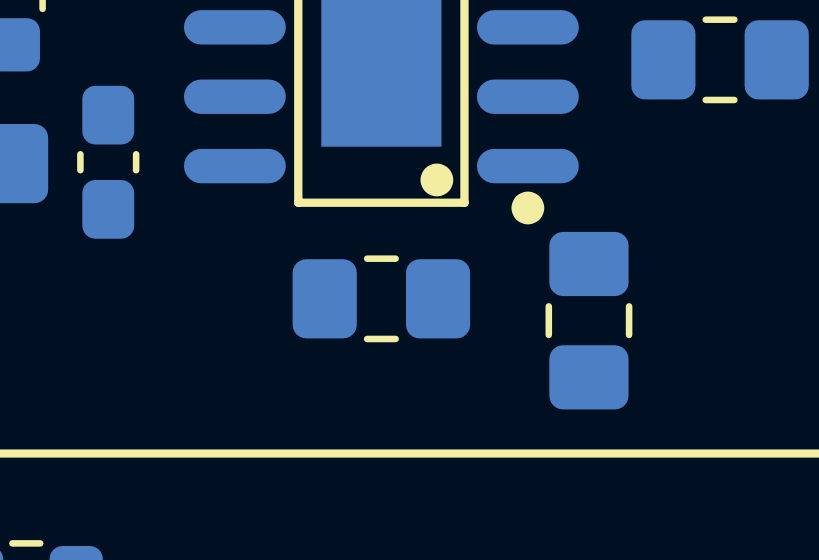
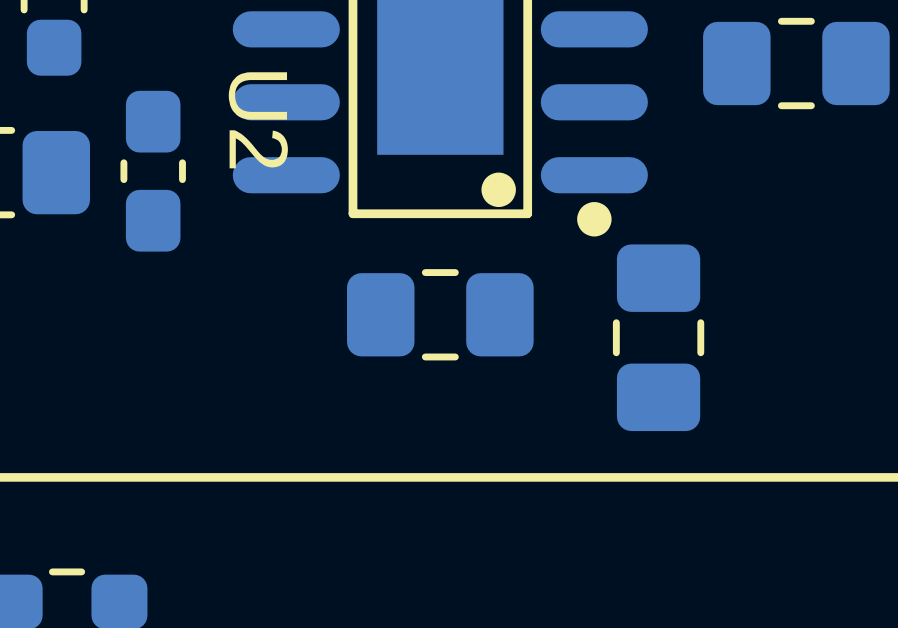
U2 name: none -> U2 (258, 120)

